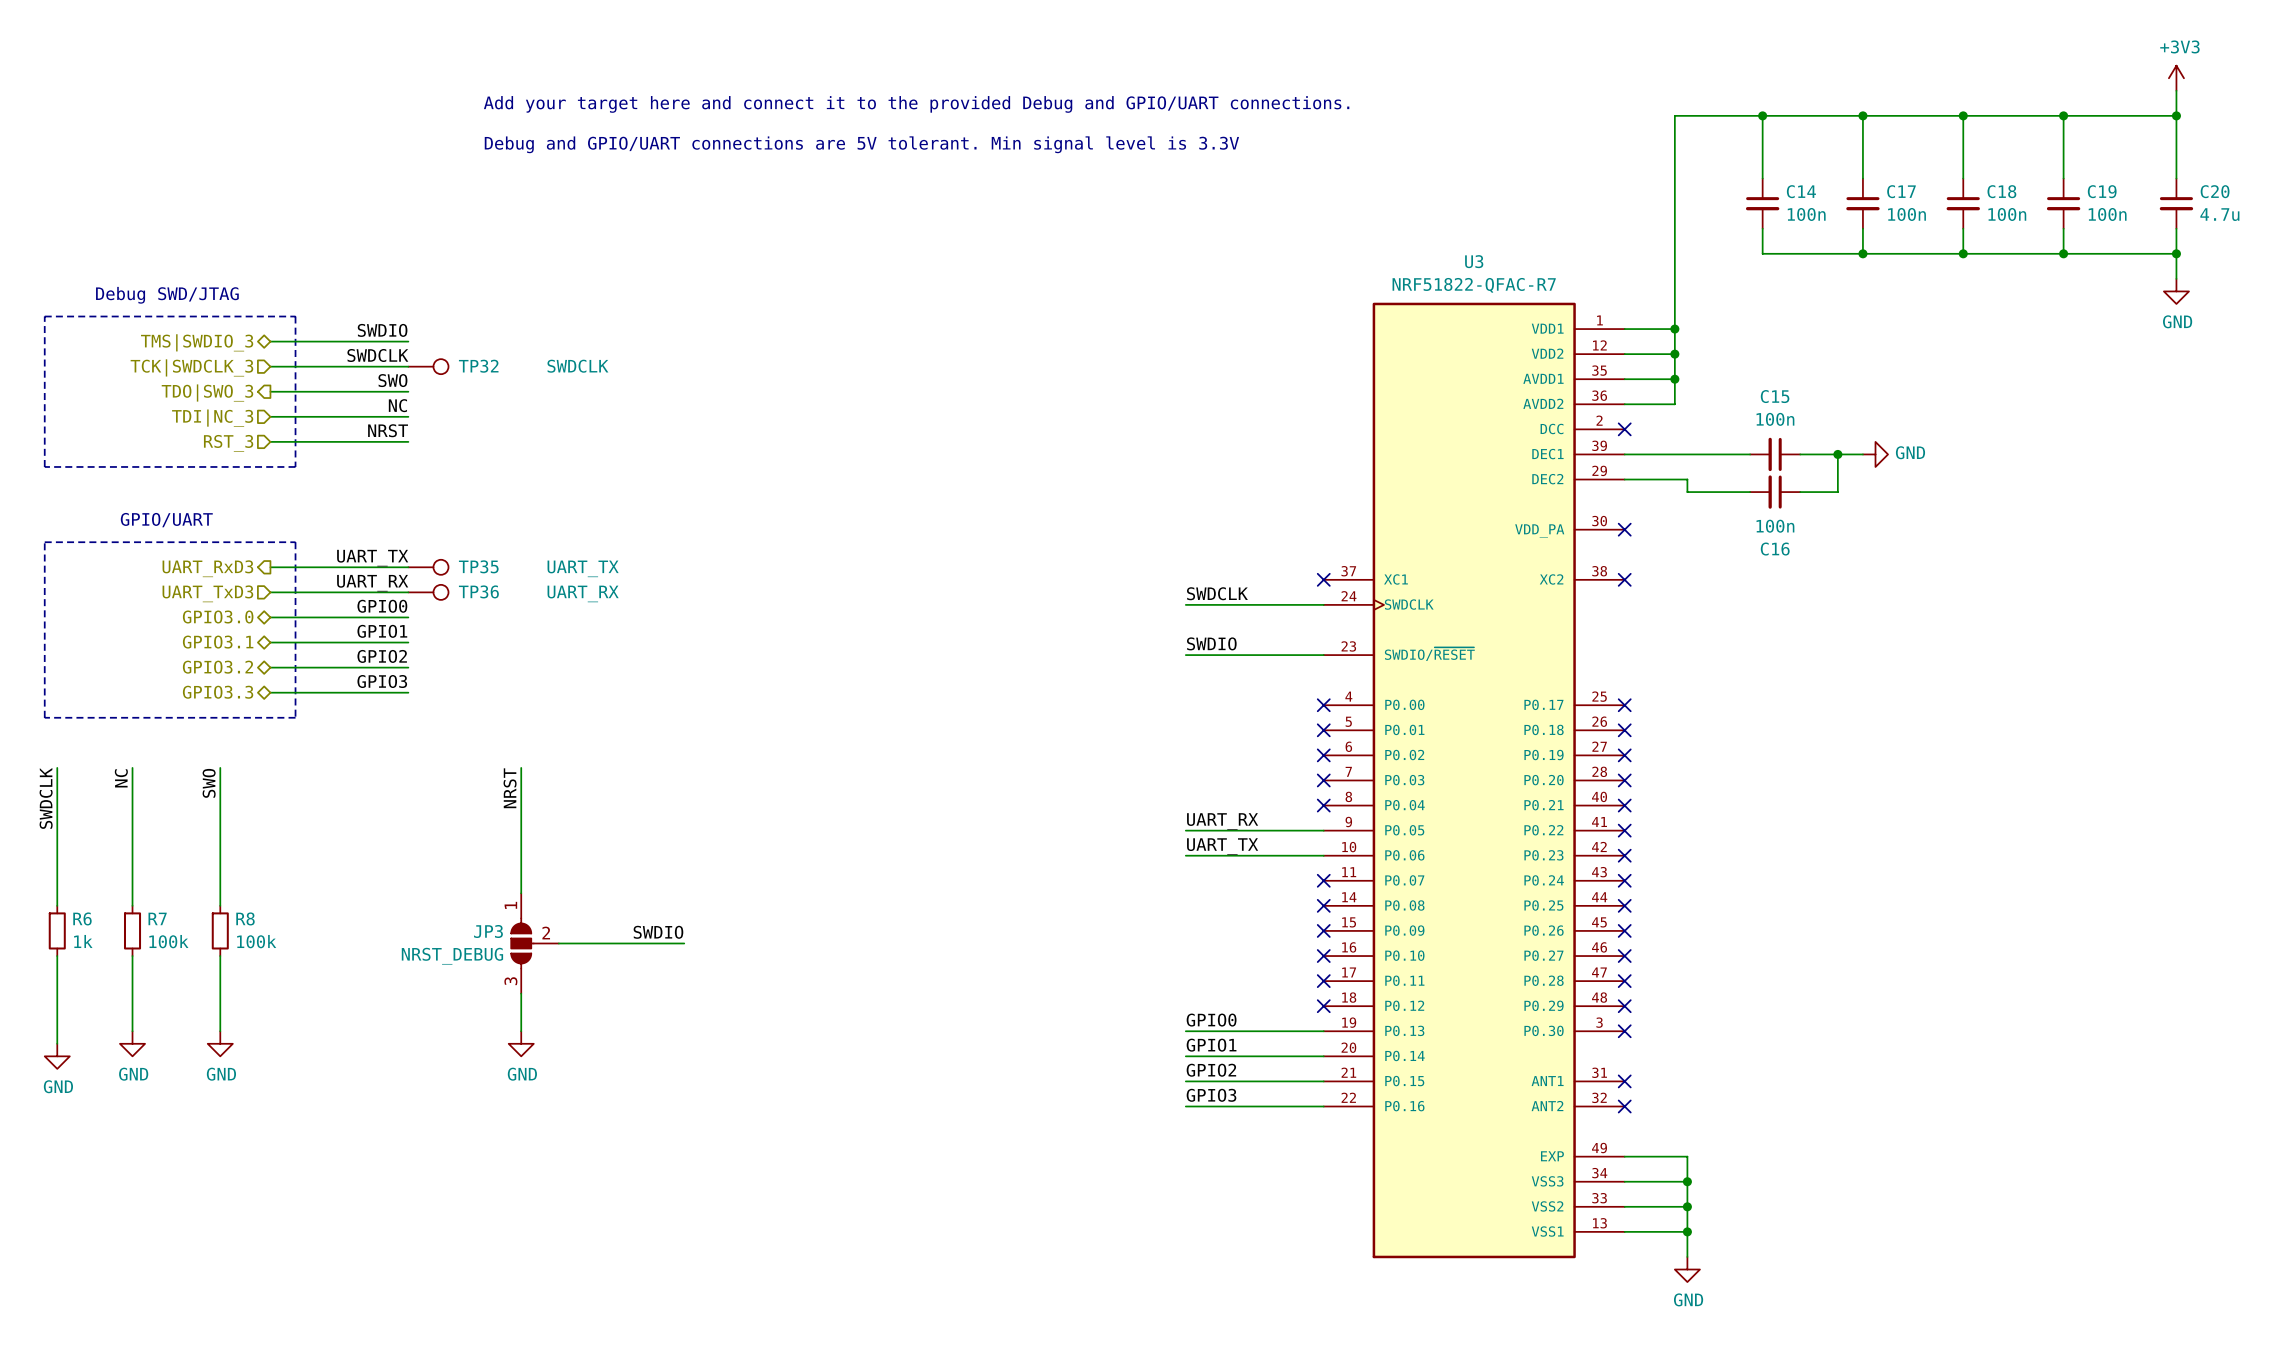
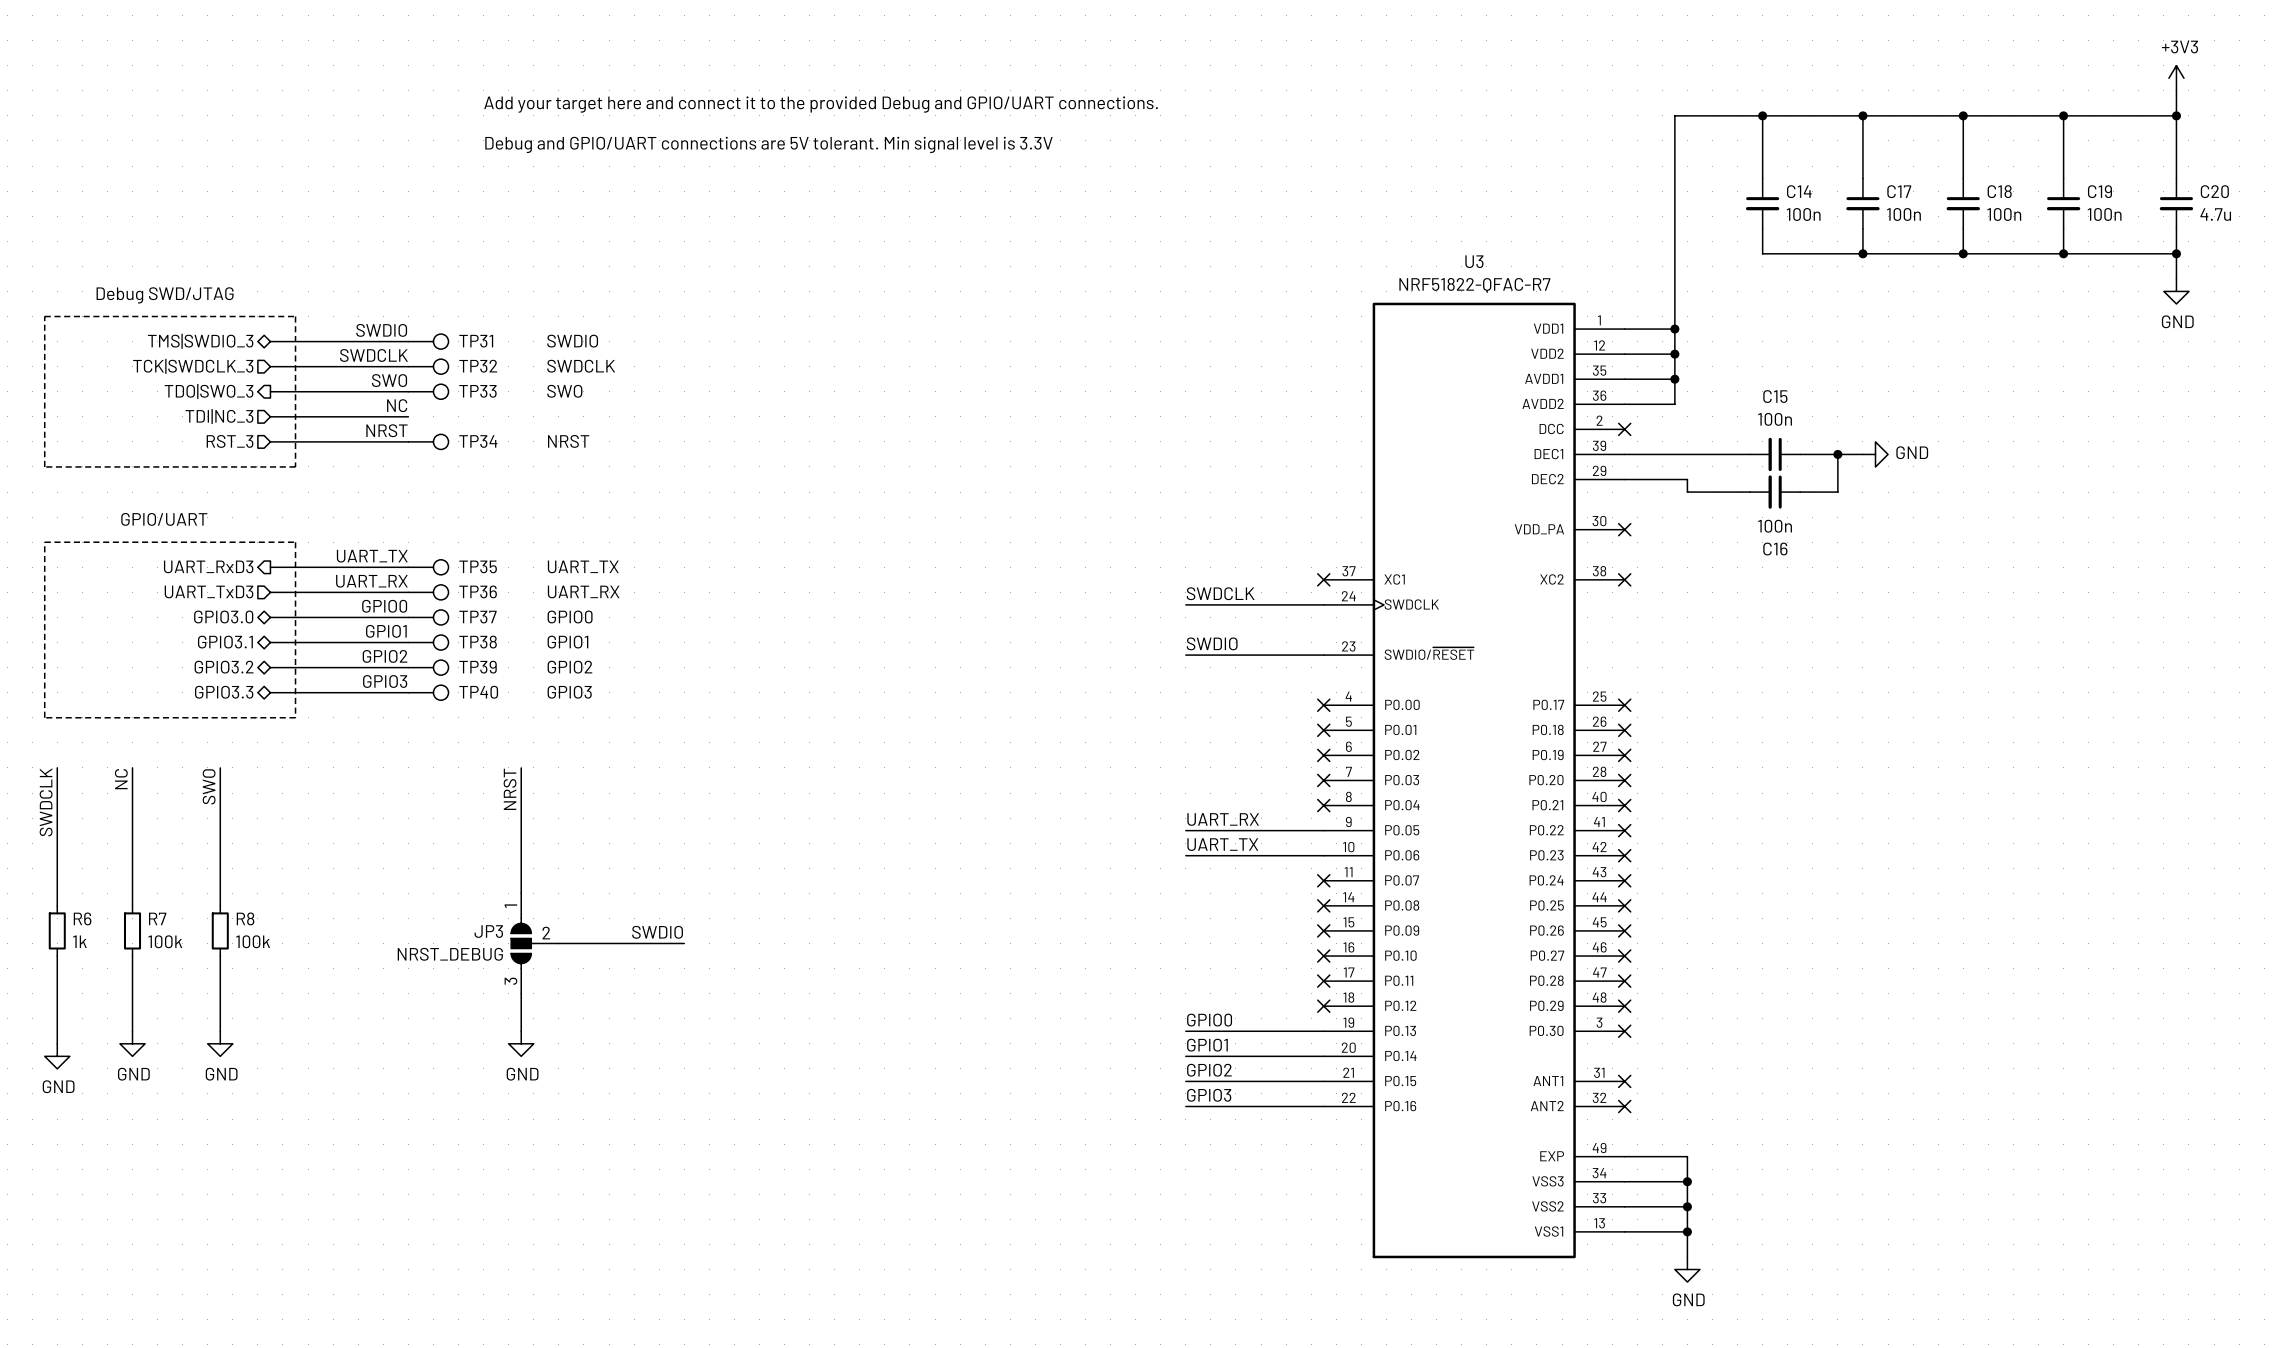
TP31: none -> SWDIO (428, 341)
TP33: none -> SWO (428, 391)
TP34: none -> NRST (428, 441)
TP37: none -> GPIO0 (428, 617)
TP38: none -> GPIO1 (428, 642)
TP39: none -> GPIO2 (428, 667)
TP40: none -> GPIO3 (428, 692)

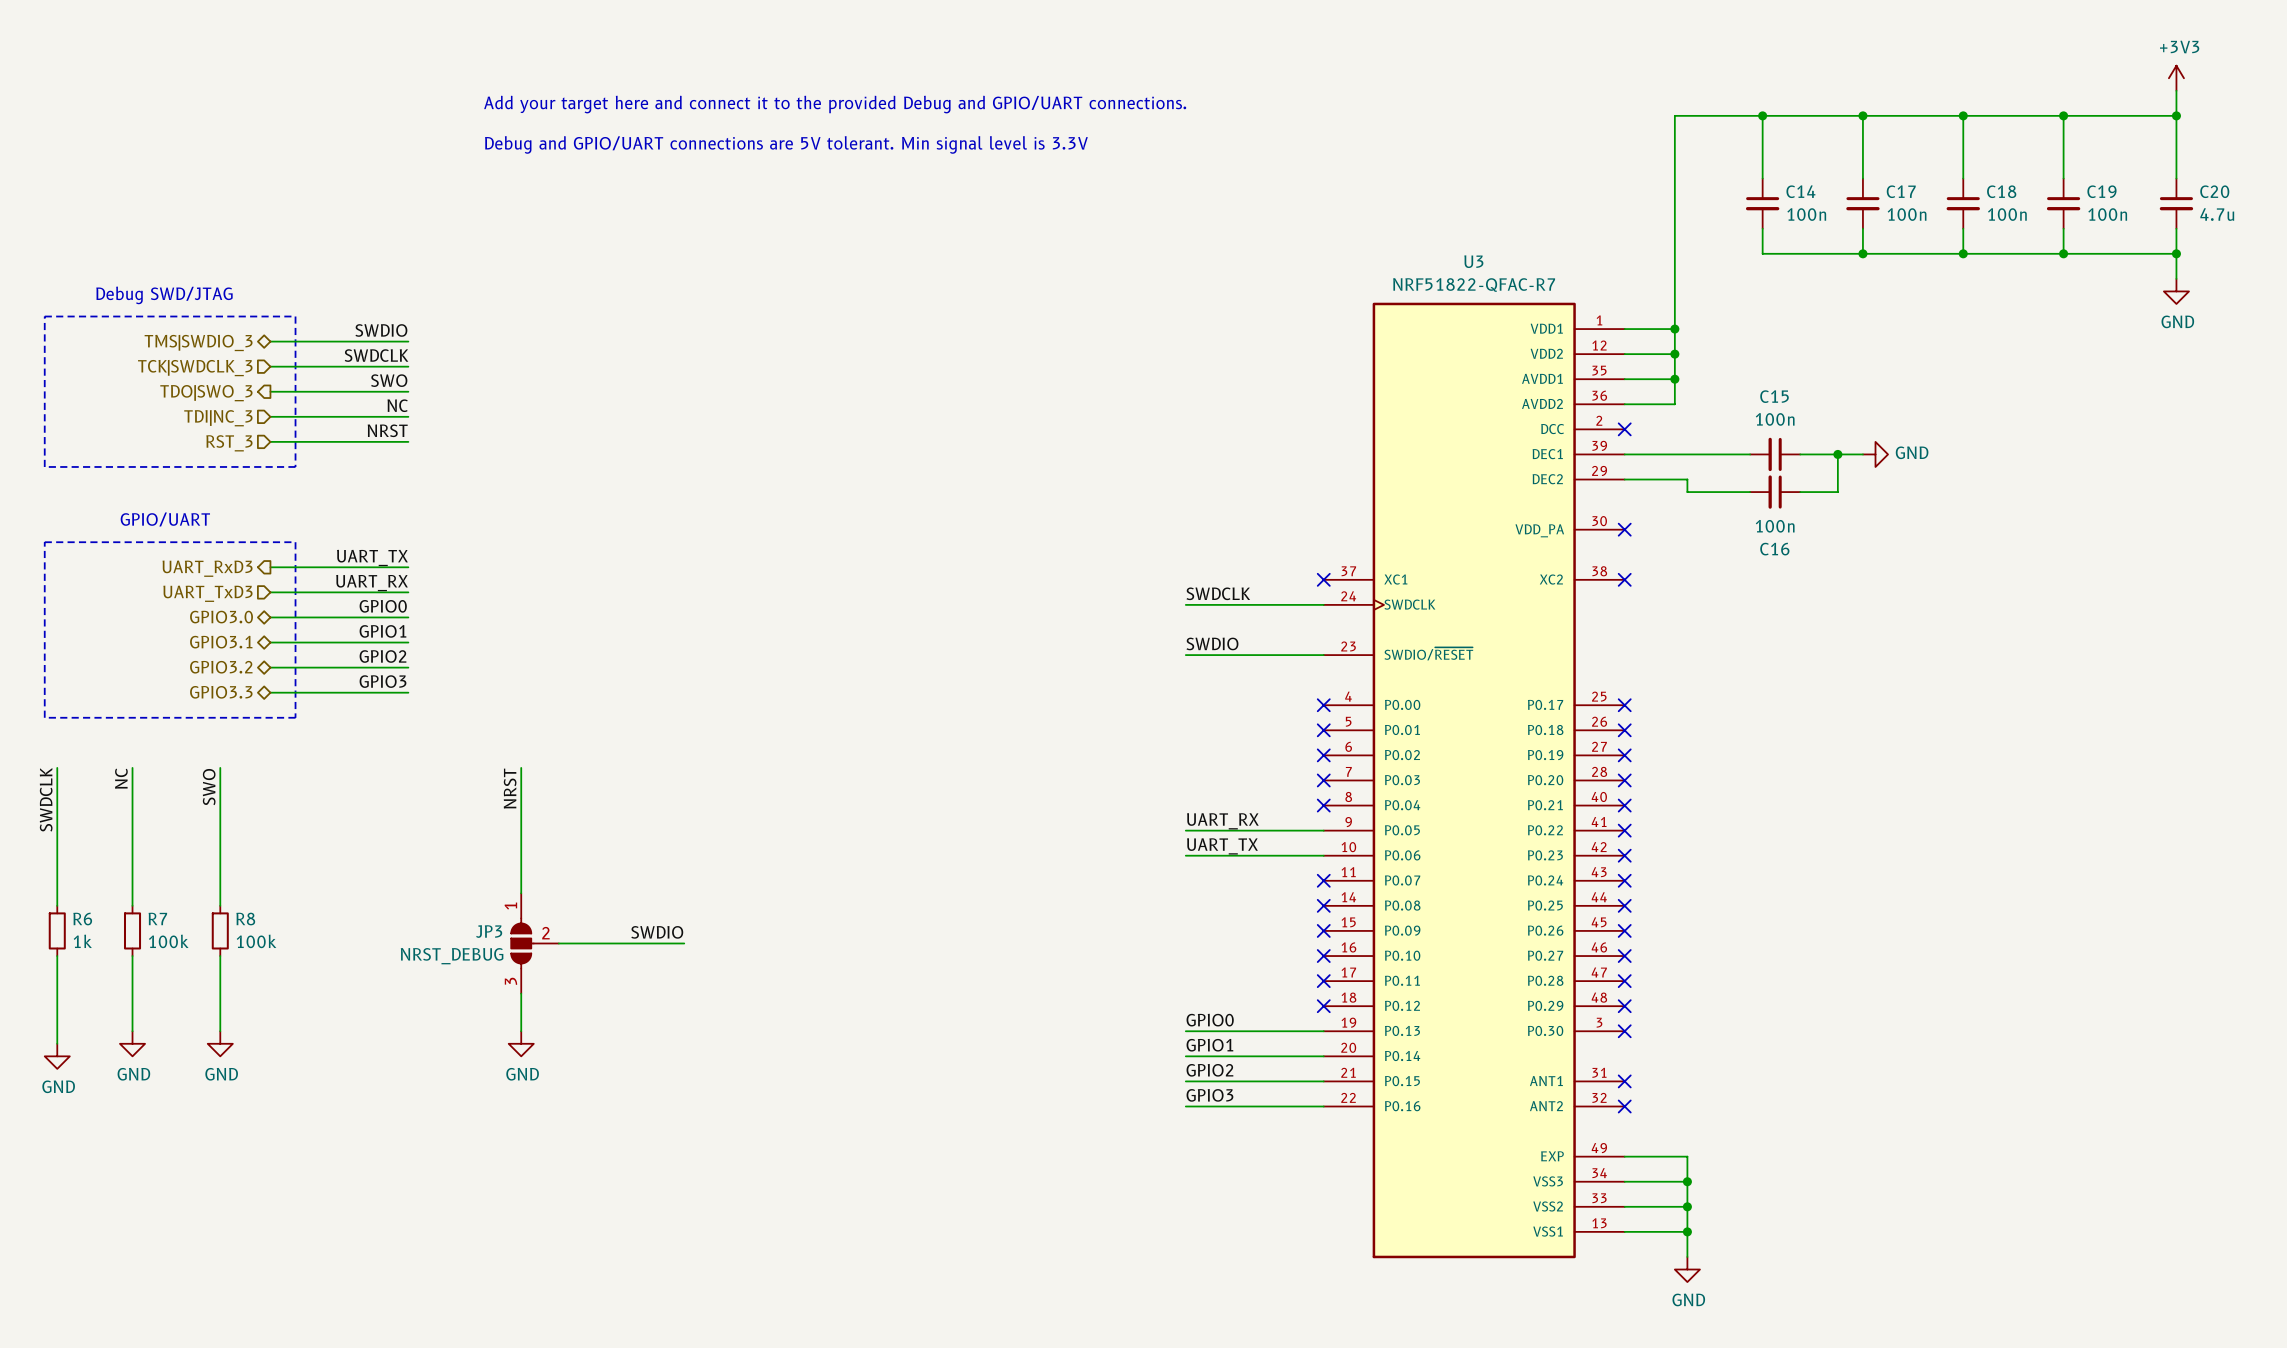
TP31: SWDIO (428, 341) -> none
TP32: SWDCLK (428, 366) -> none
TP33: SWO (428, 391) -> none
TP34: NRST (428, 441) -> none
TP35: UART_TX (428, 567) -> none
TP36: UART_RX (428, 592) -> none
TP37: GPIO0 (428, 617) -> none
TP38: GPIO1 (428, 642) -> none
TP39: GPIO2 (428, 667) -> none
TP40: GPIO3 (428, 692) -> none

